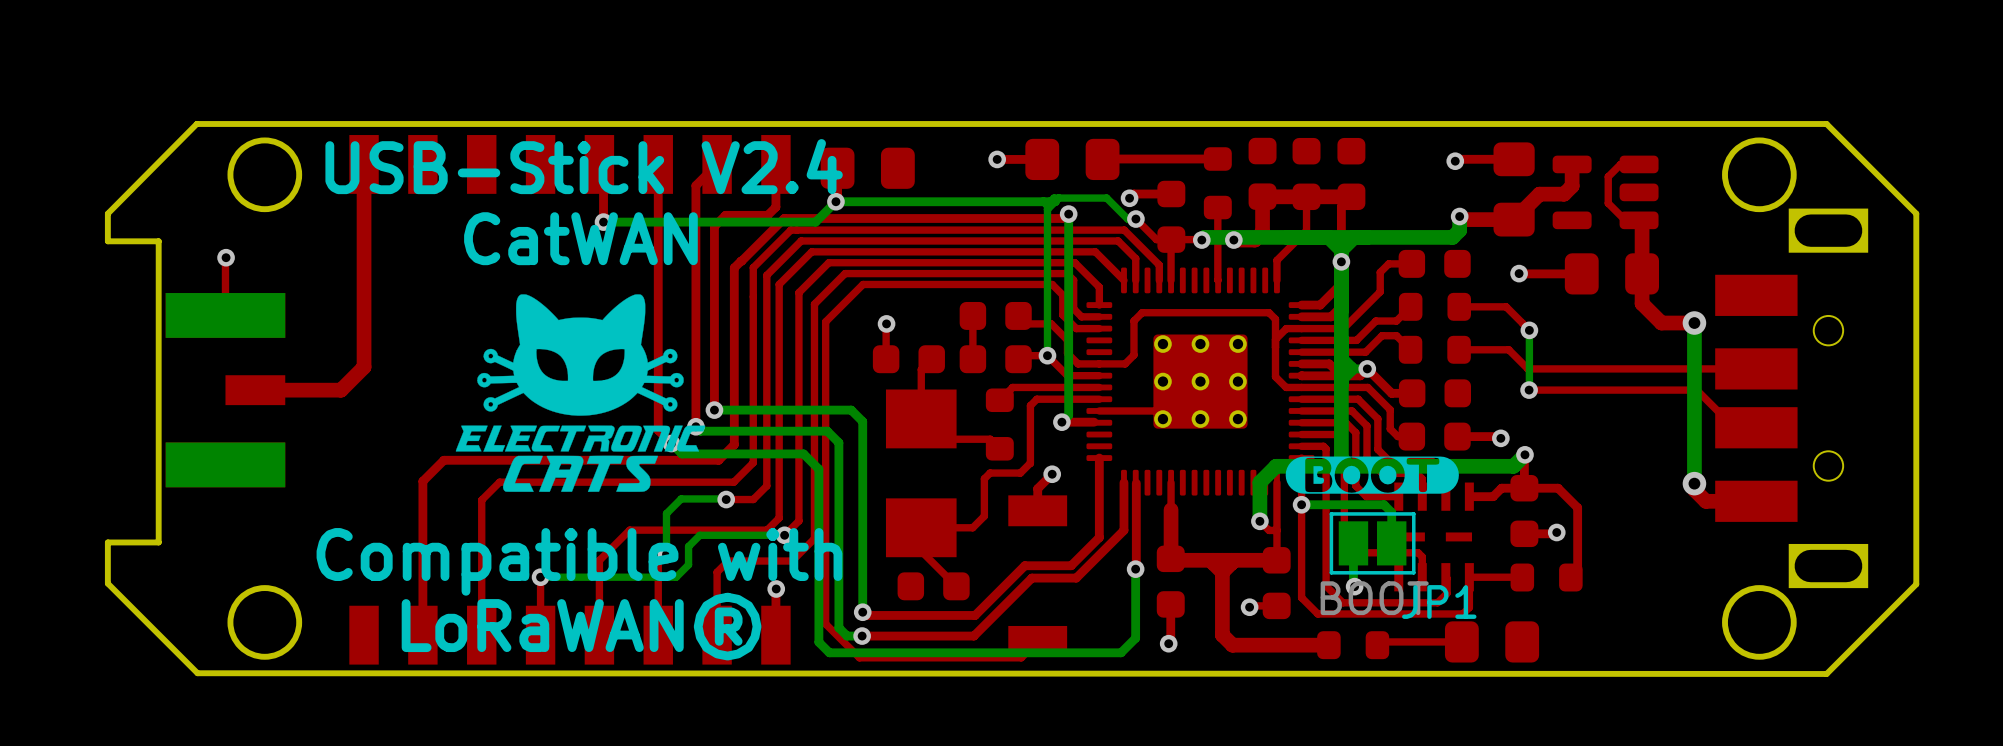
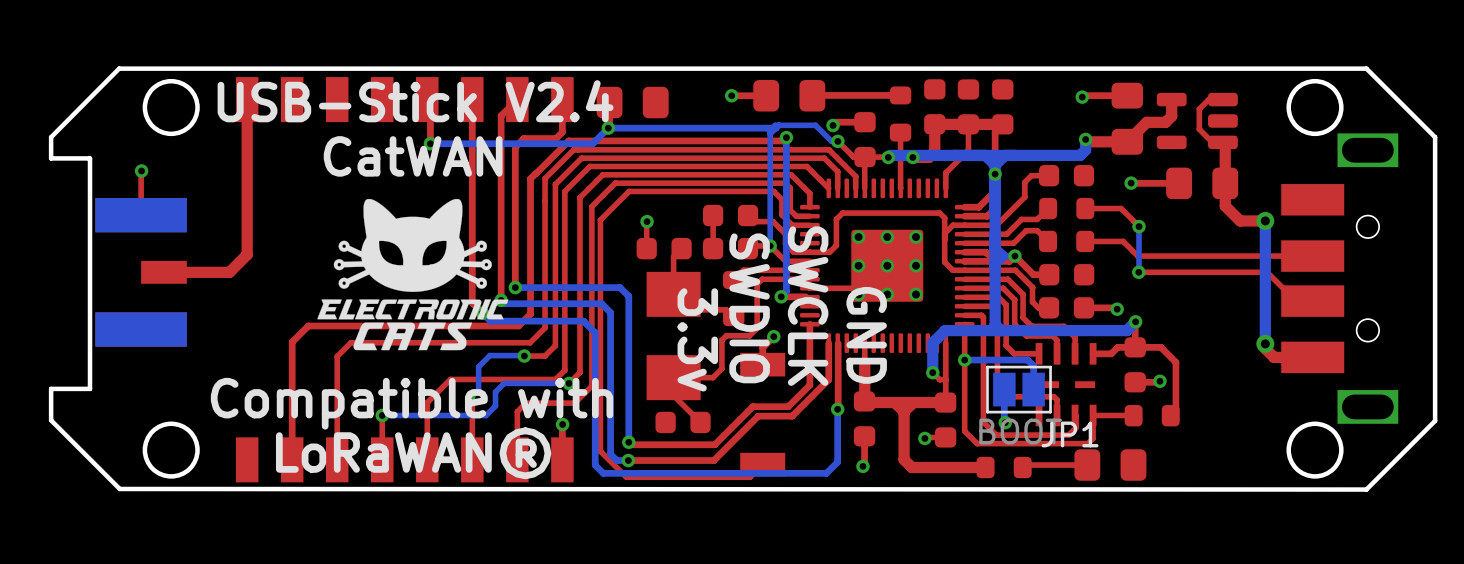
text: none -> SWCLK (808, 306)
text: none -> SWDIO (749, 308)
drawing: [1285, 456, 1459, 494] -> none
text: none -> GND (866, 335)
text: none -> 3.3v (697, 339)

